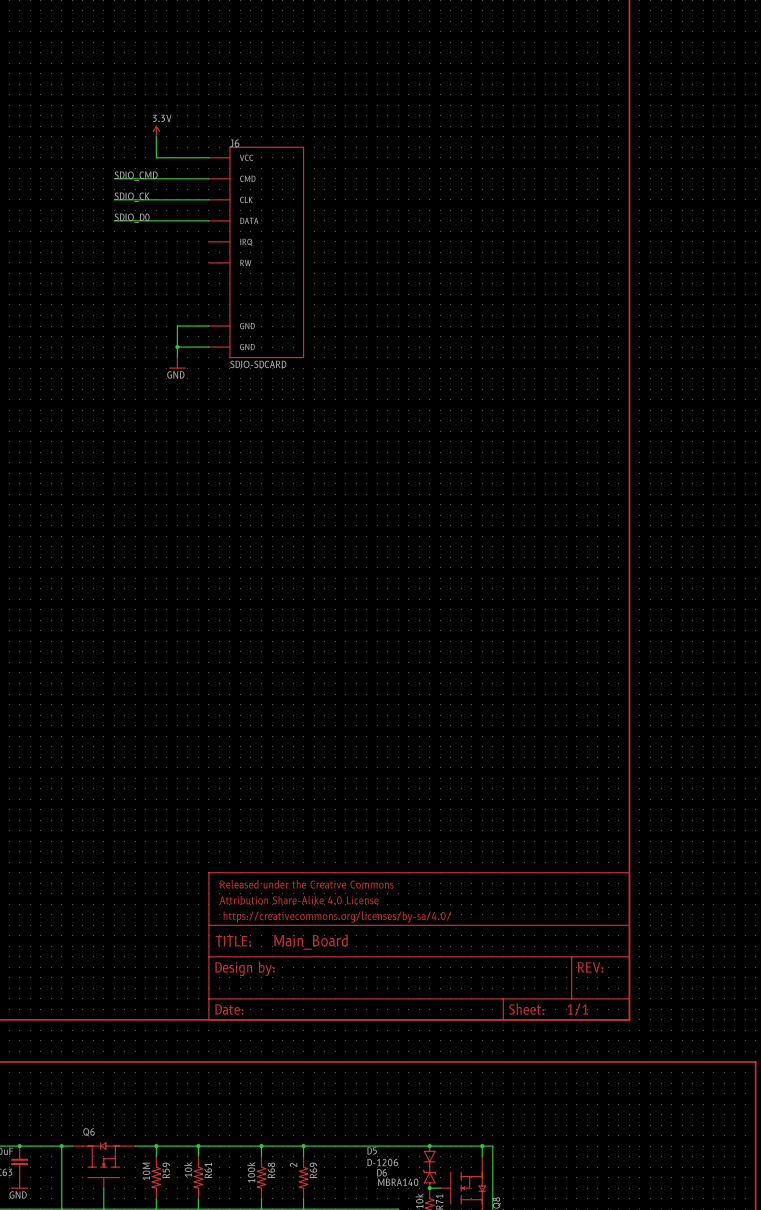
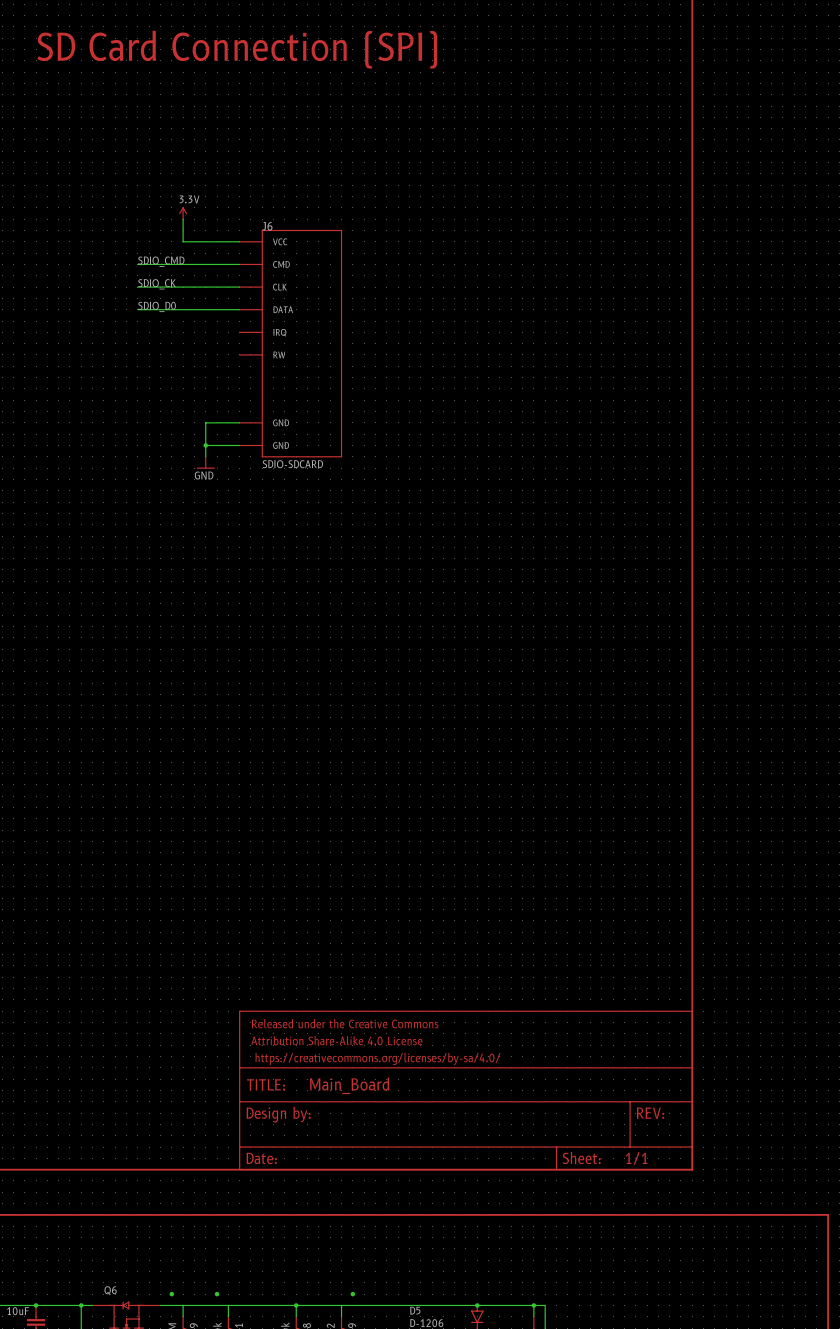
junction position: (156, 1146) -> (171, 1294)
junction position: (198, 1146) -> (217, 1294)
junction position: (303, 1146) -> (352, 1294)

